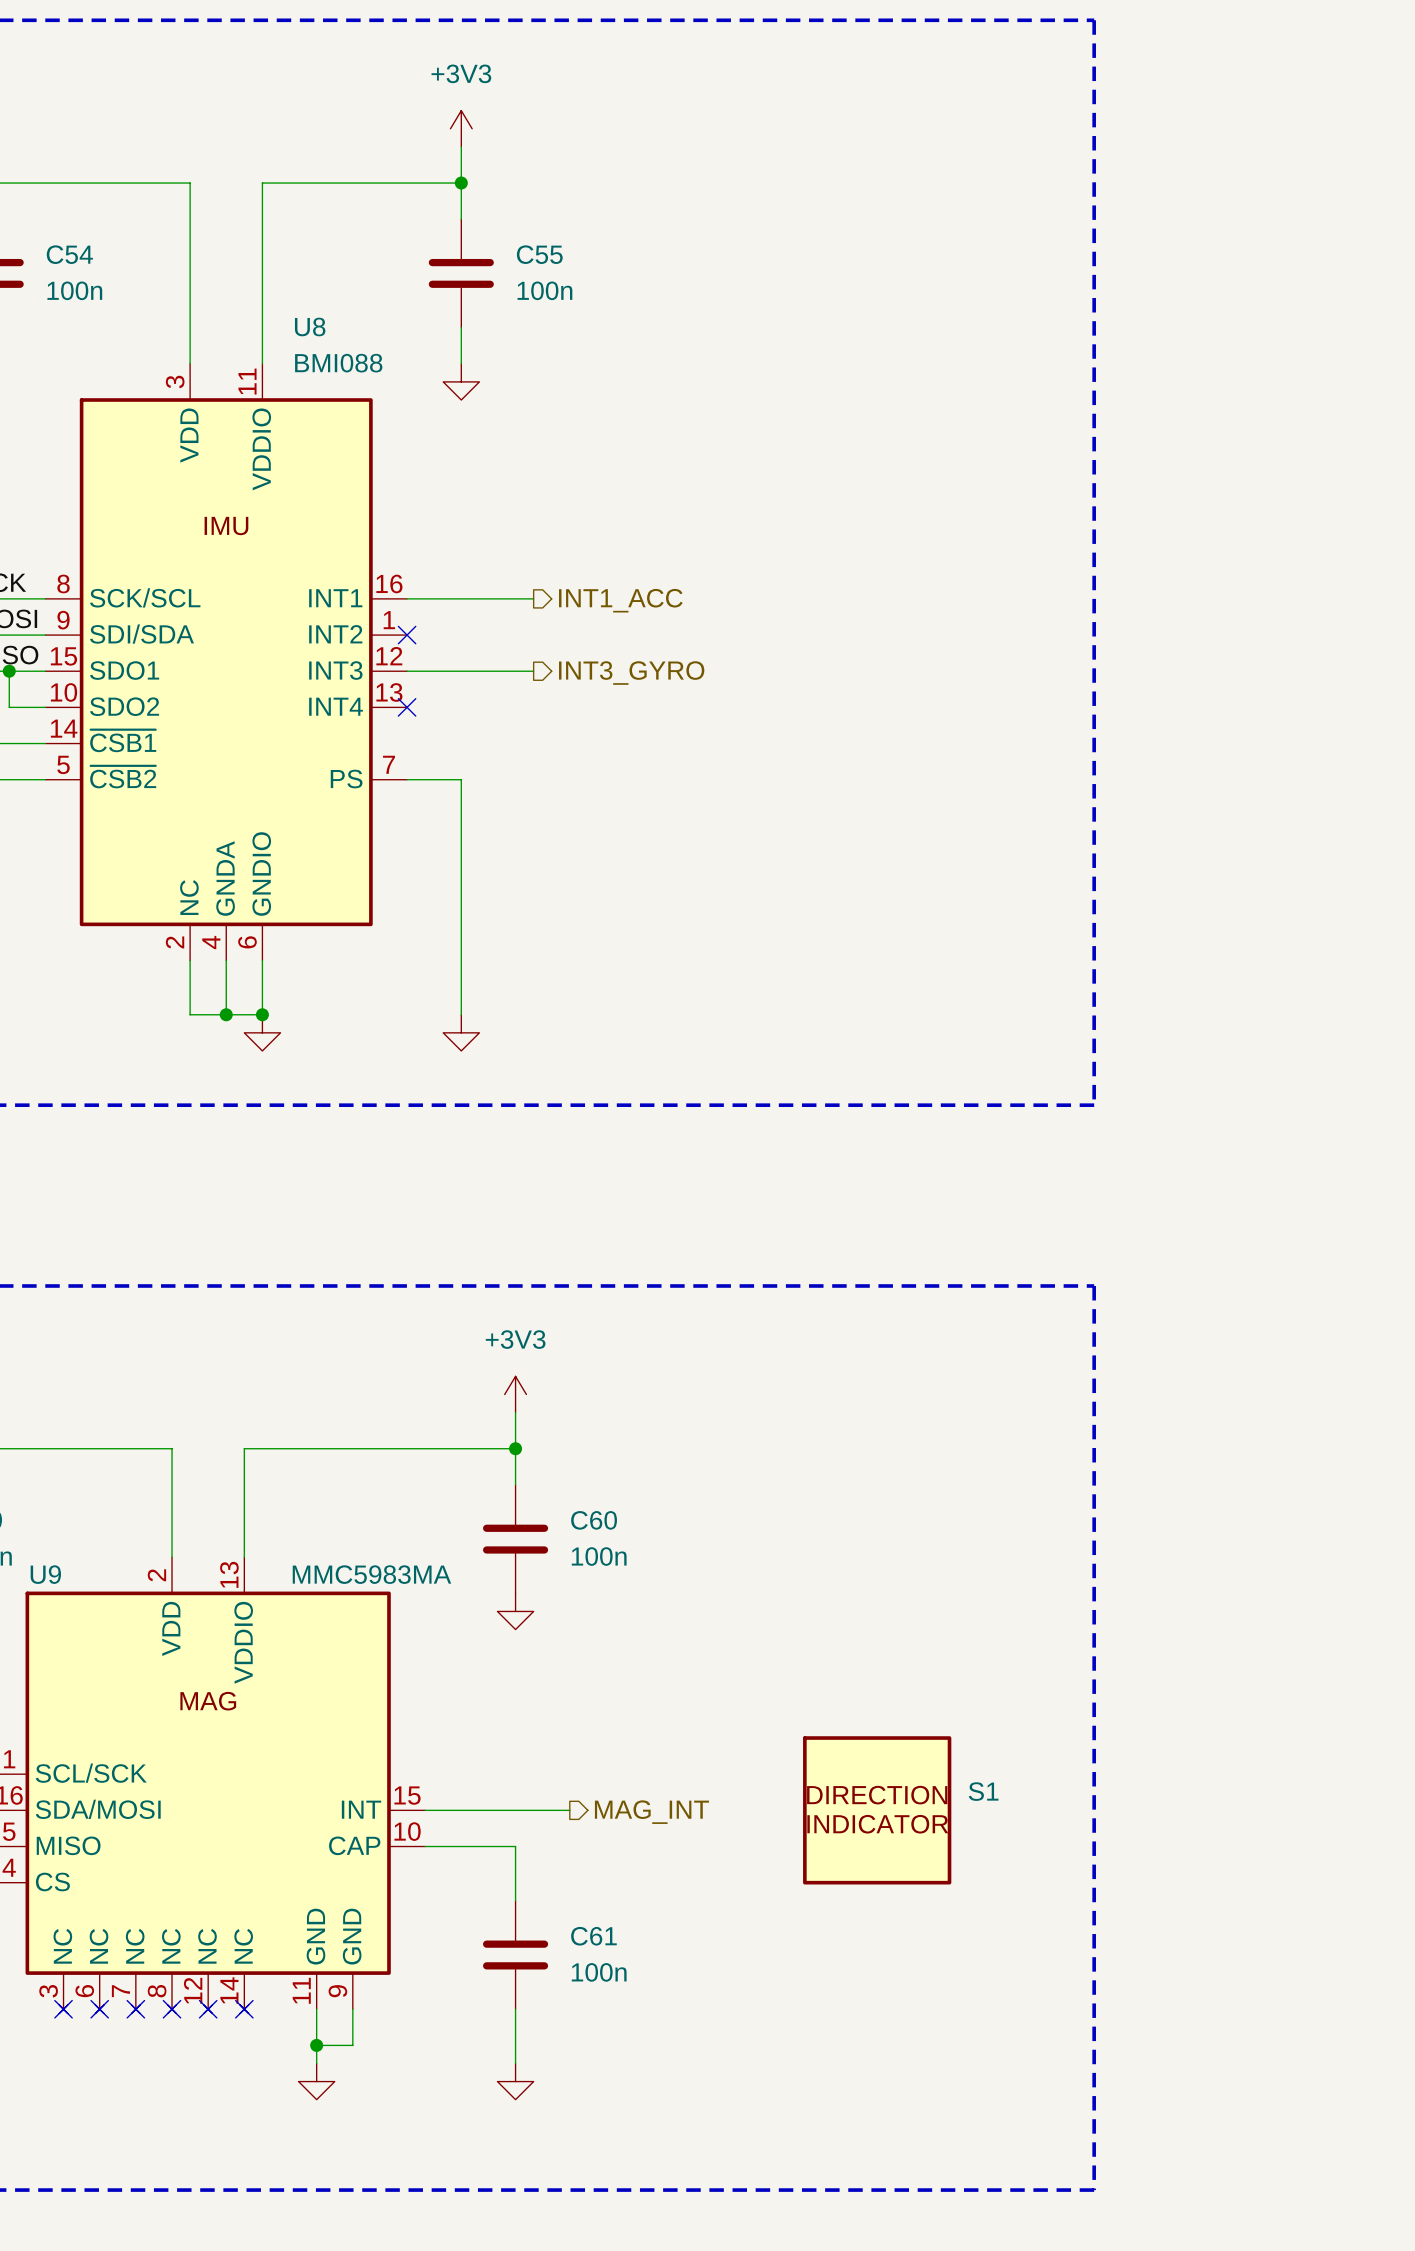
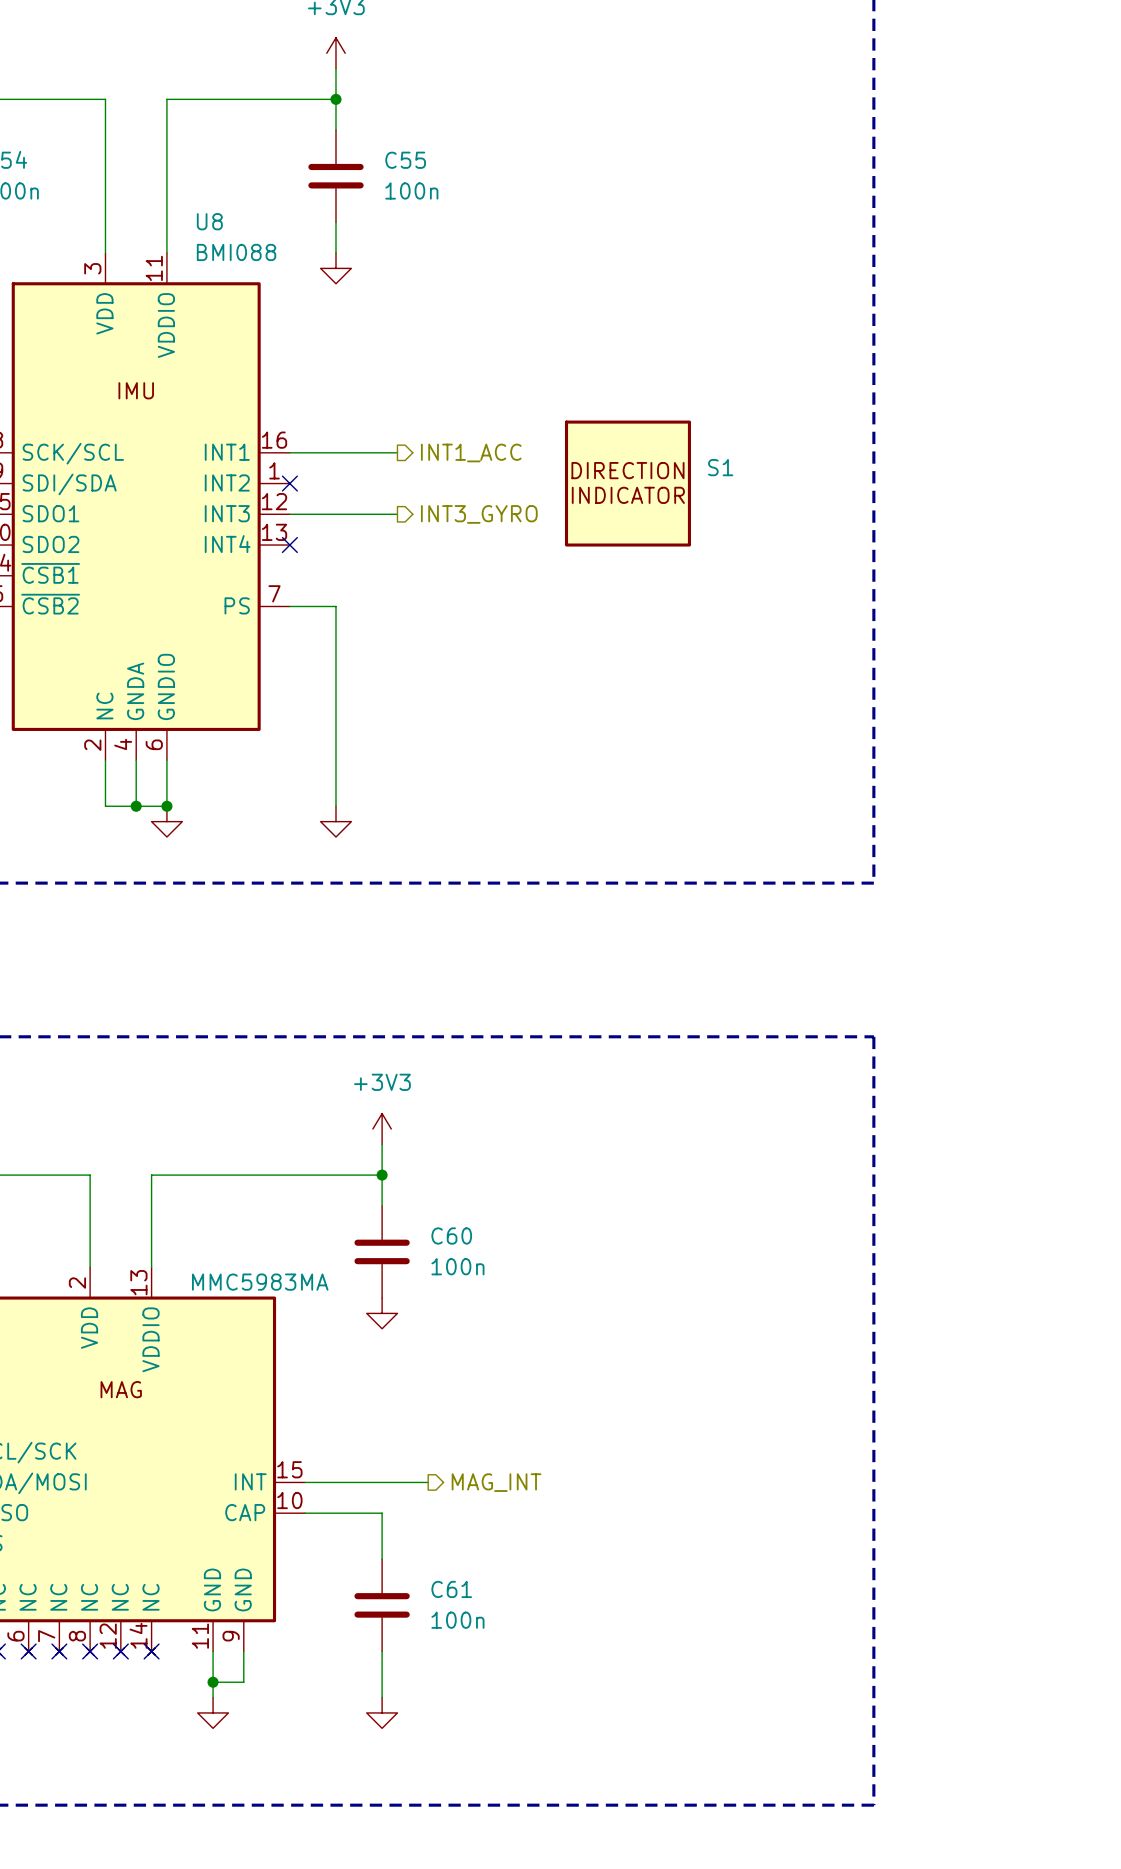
S1 position: (877, 1810) -> (627, 483)

